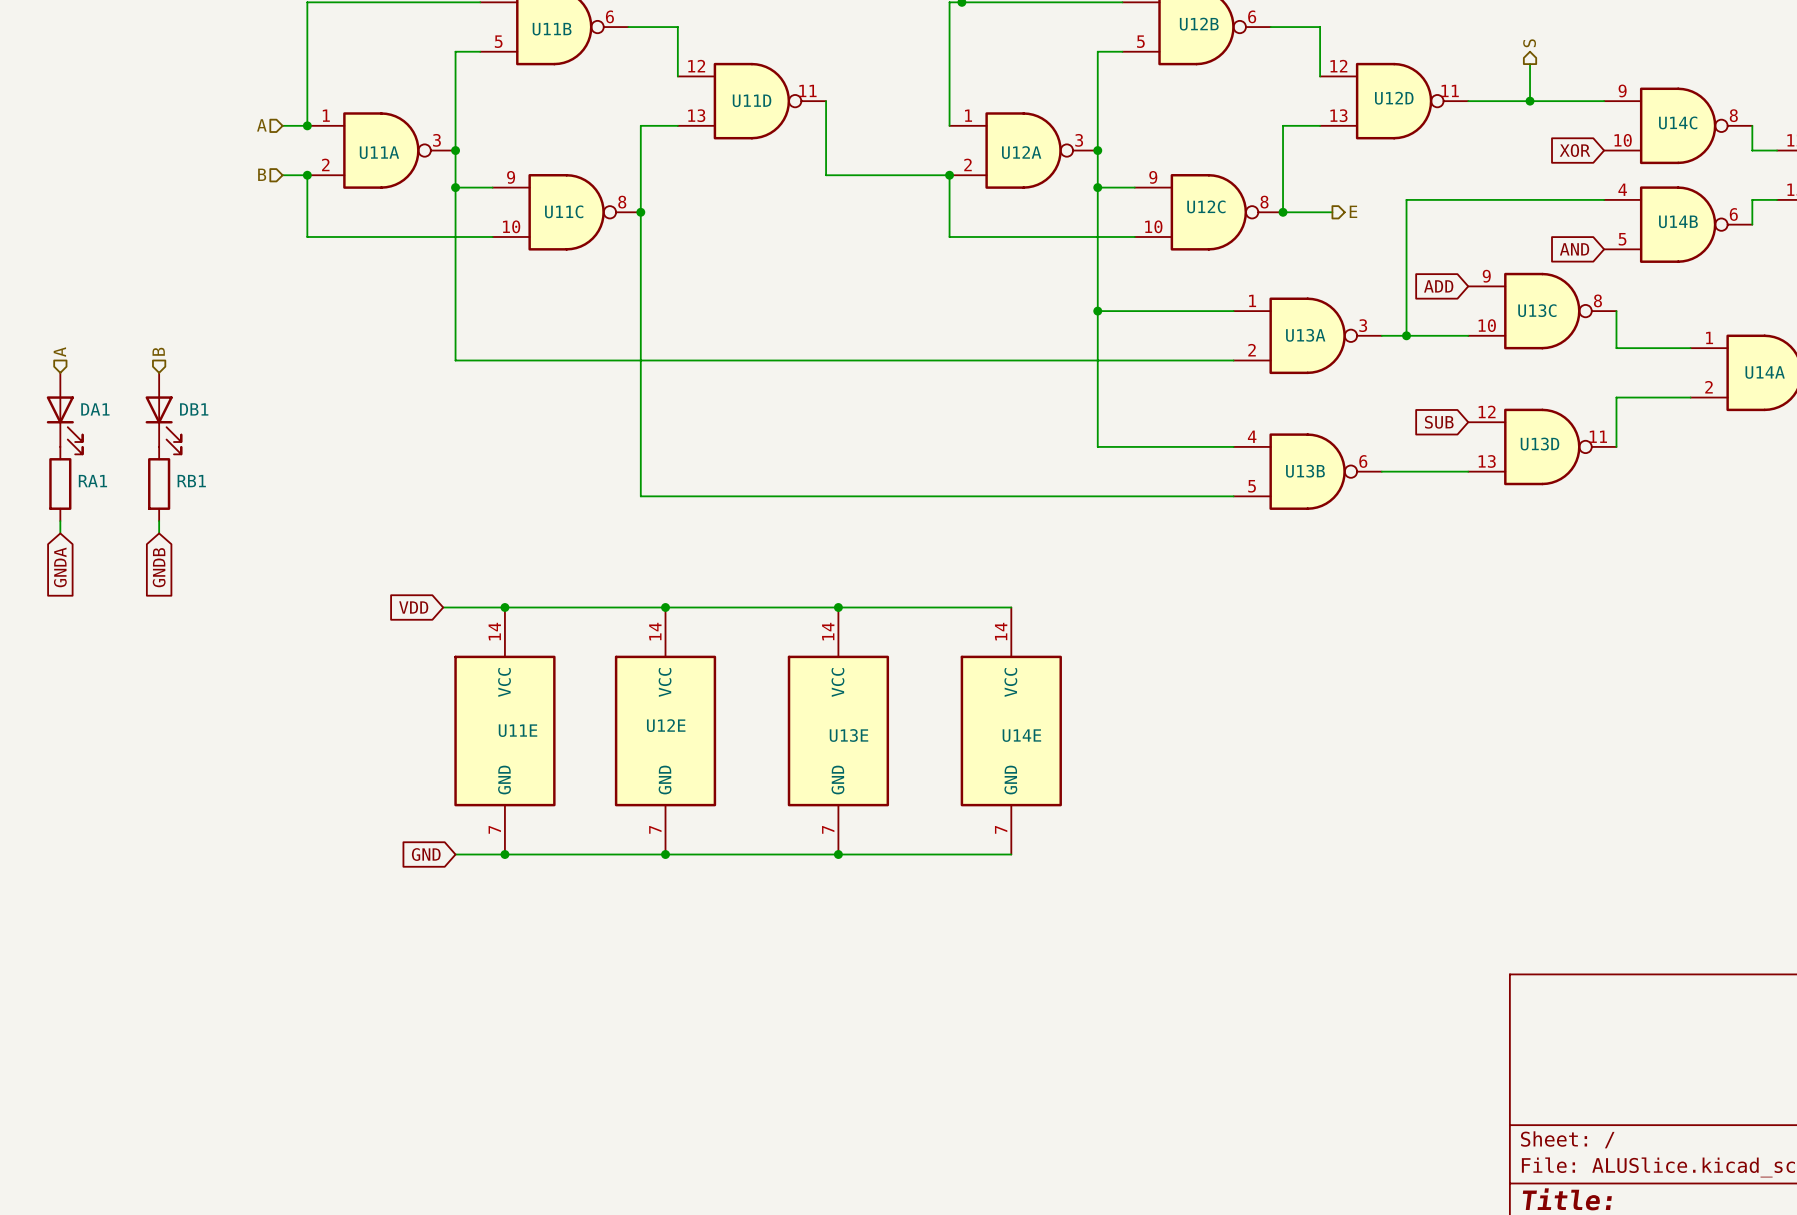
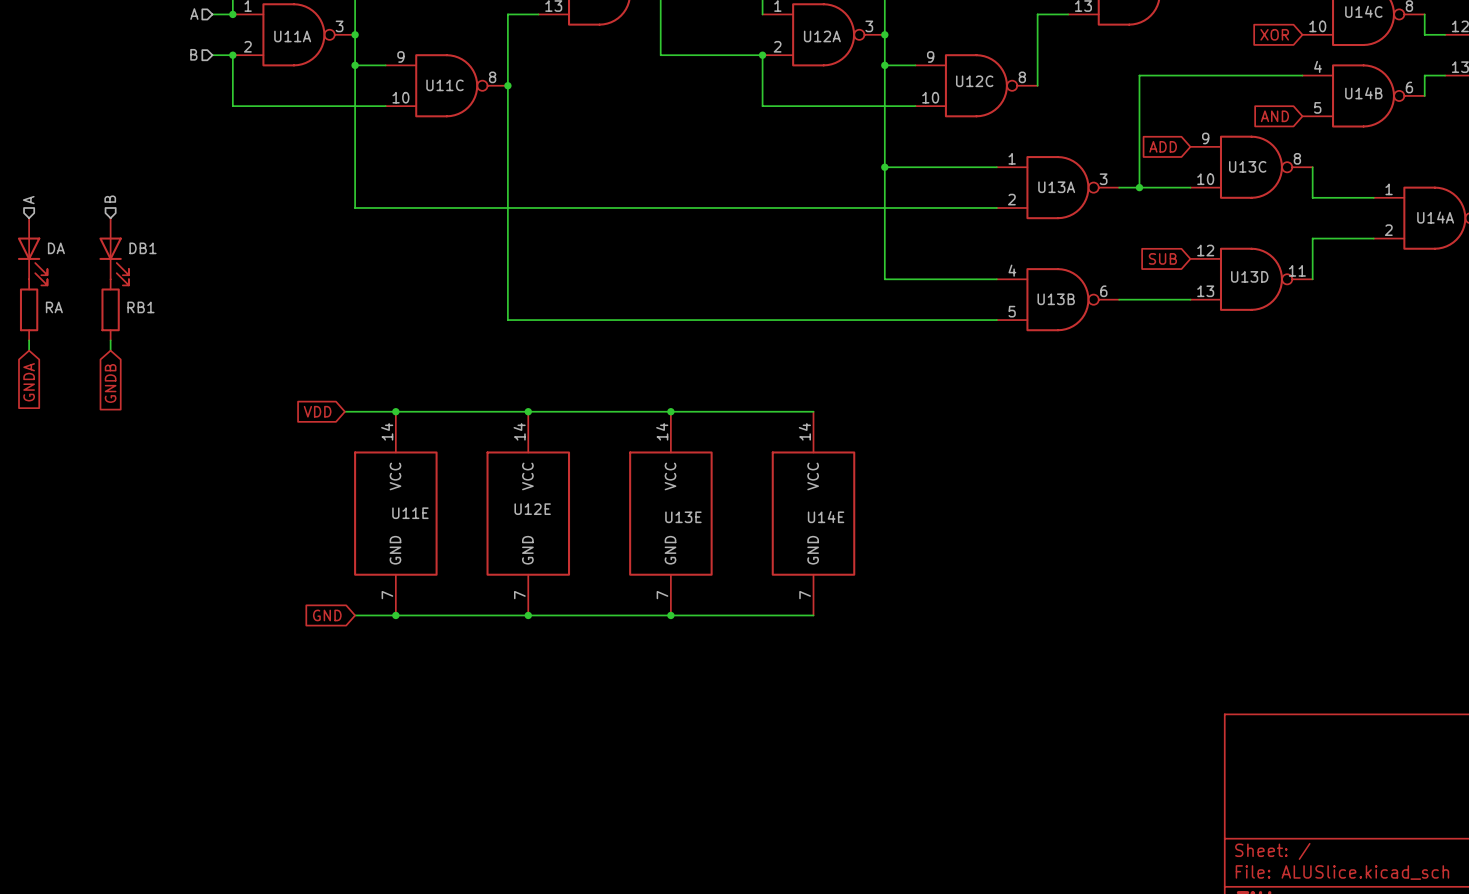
hierarchical label: E (1353, 211) -> none
wire: (1283, 212) (1332, 212) -> none
junction: (1283, 212) -> none
DA1 name: DA1 (95, 409) -> DA (56, 248)
RA1 name: RA1 (92, 481) -> RA (54, 307)

